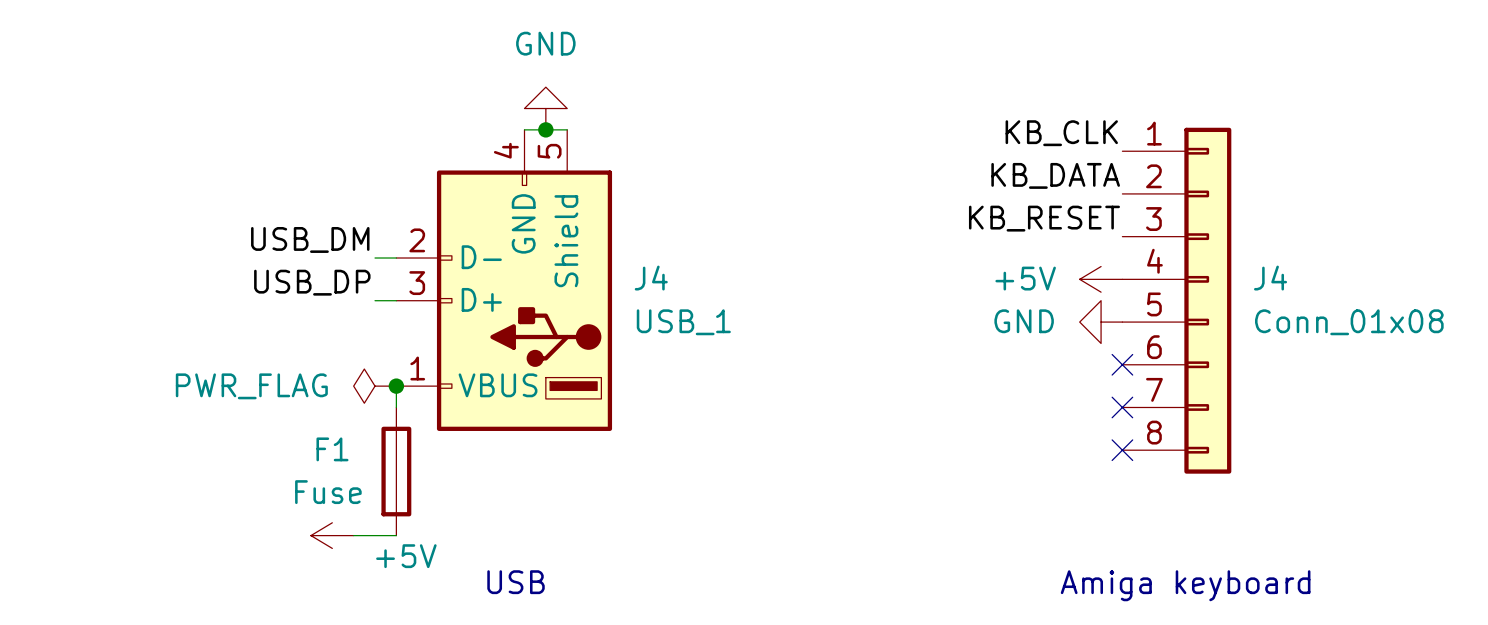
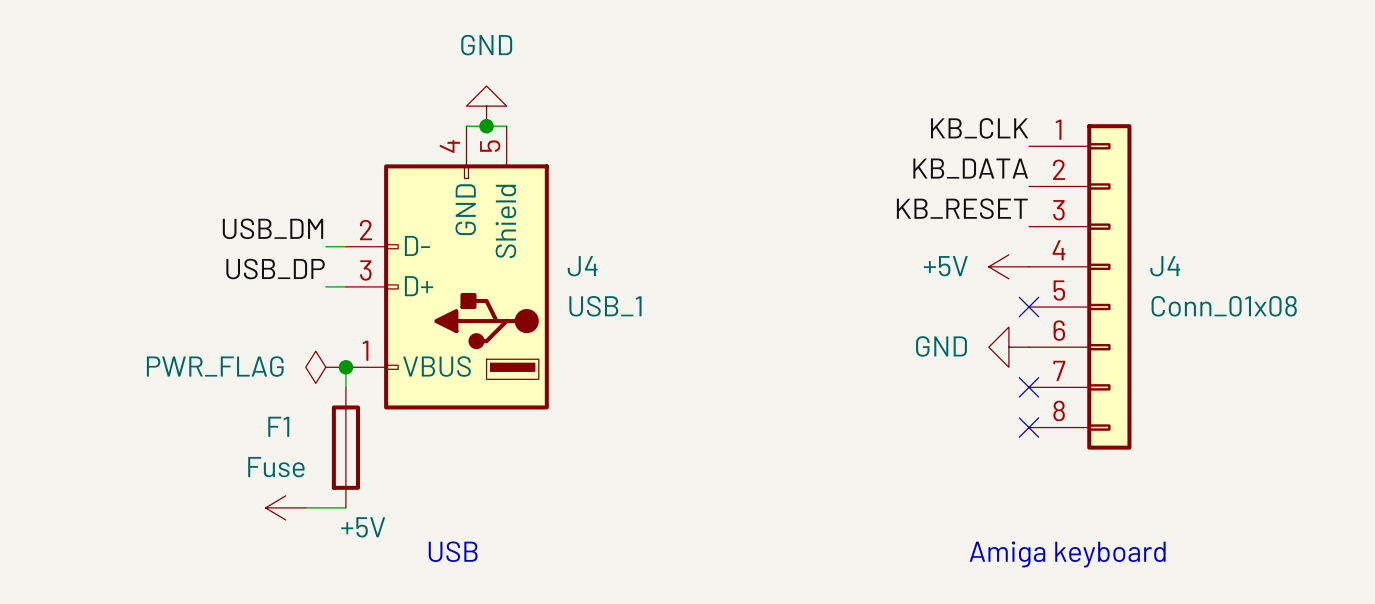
power symbol position: GND (1101, 322) -> GND (1008, 347)
no-connect mark position: (1122, 364) -> (1028, 307)

